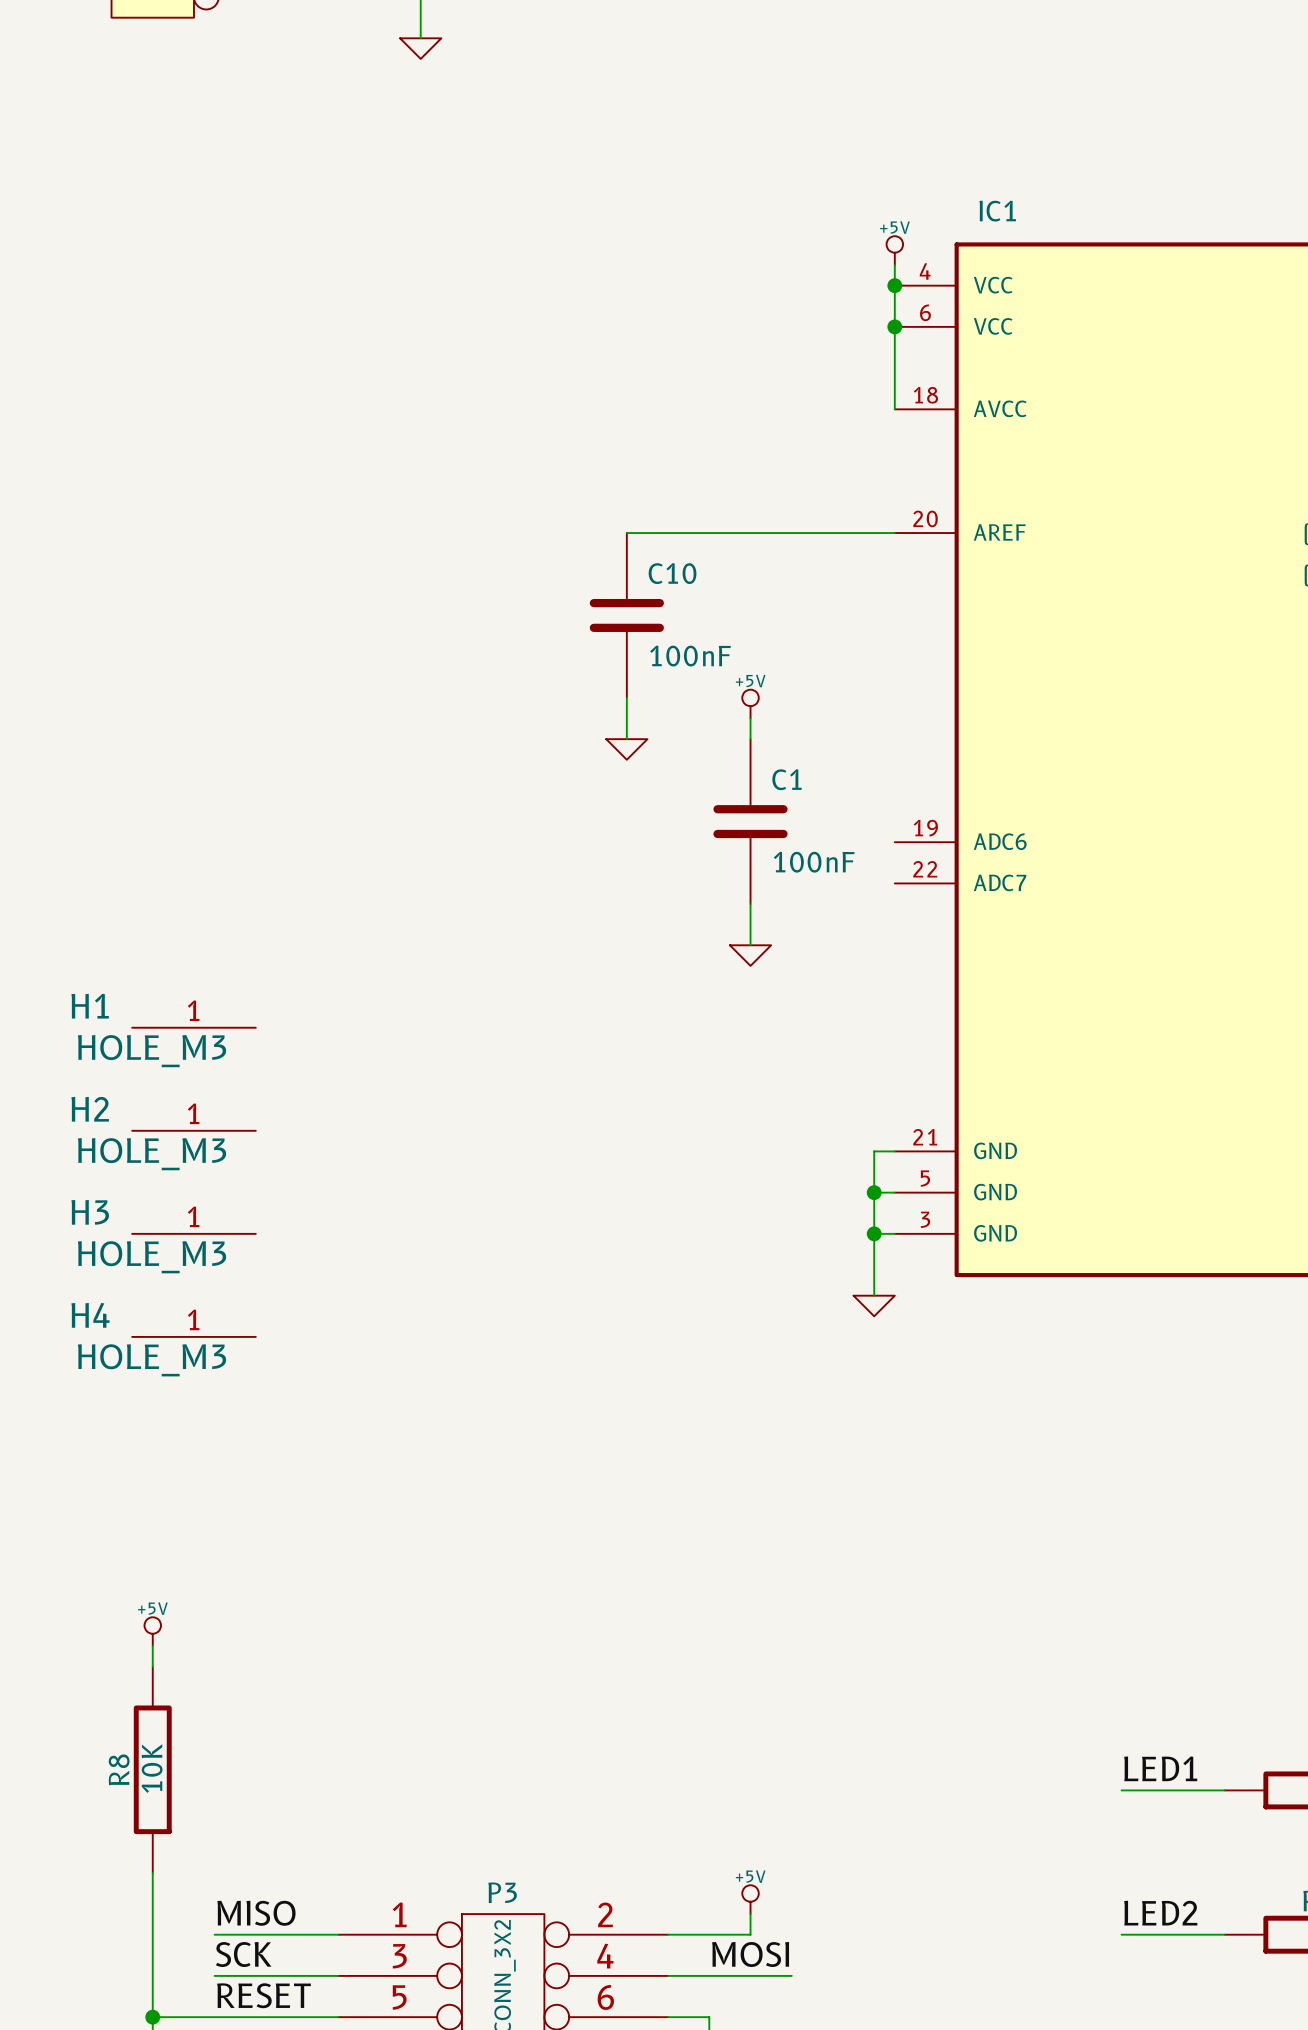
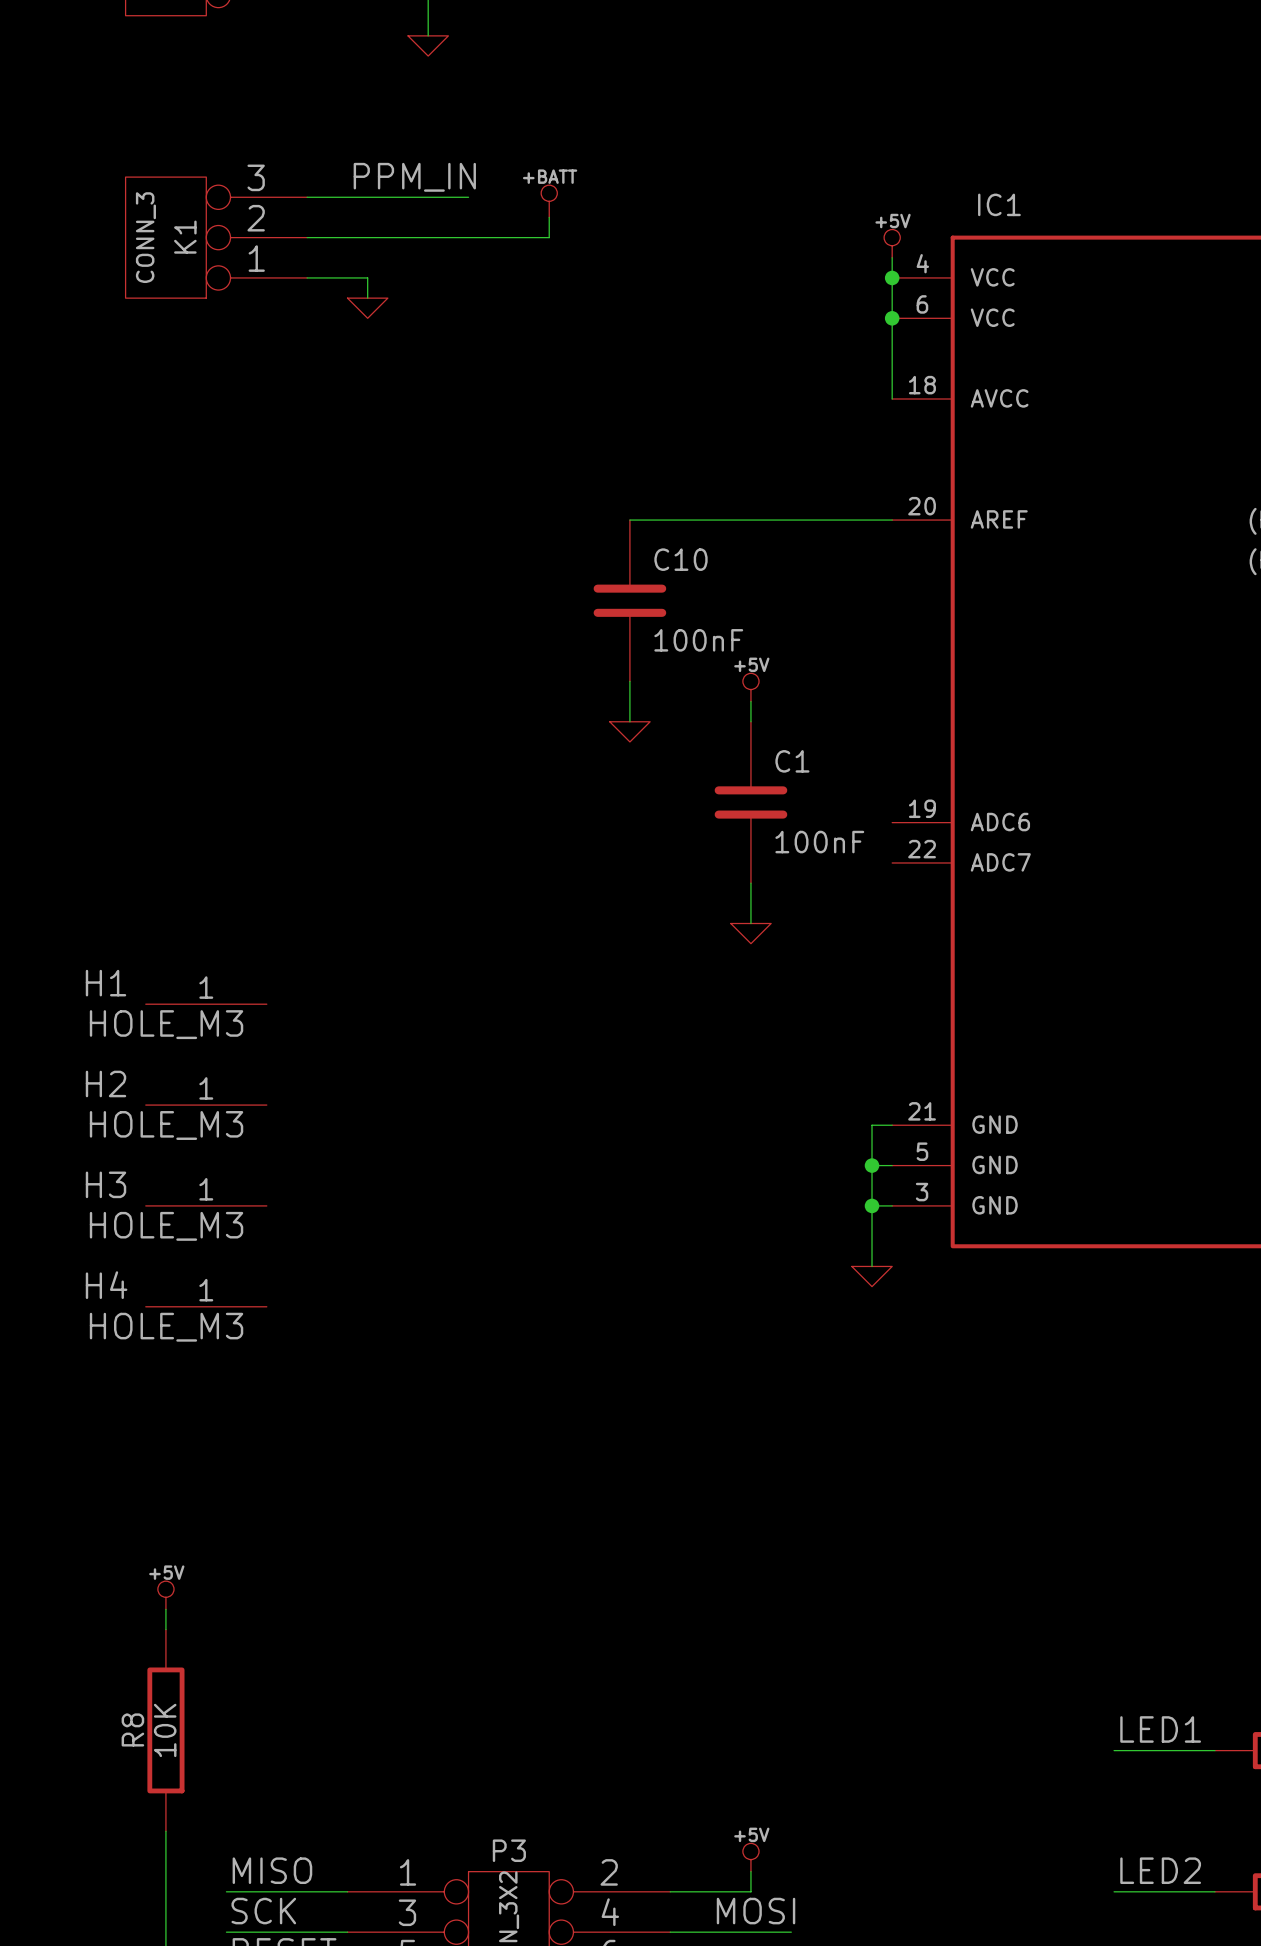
label: none -> PPM_IN (414, 177)
wire: none -> (307, 197) (468, 197)
power symbol: none -> +BATT (549, 201)
wire: none -> (549, 217) (549, 237) (307, 237)
K1: none -> CONN_3 (216, 237)
wire: none -> (307, 277) (367, 277) (367, 298)
power symbol: none -> (367, 308)

